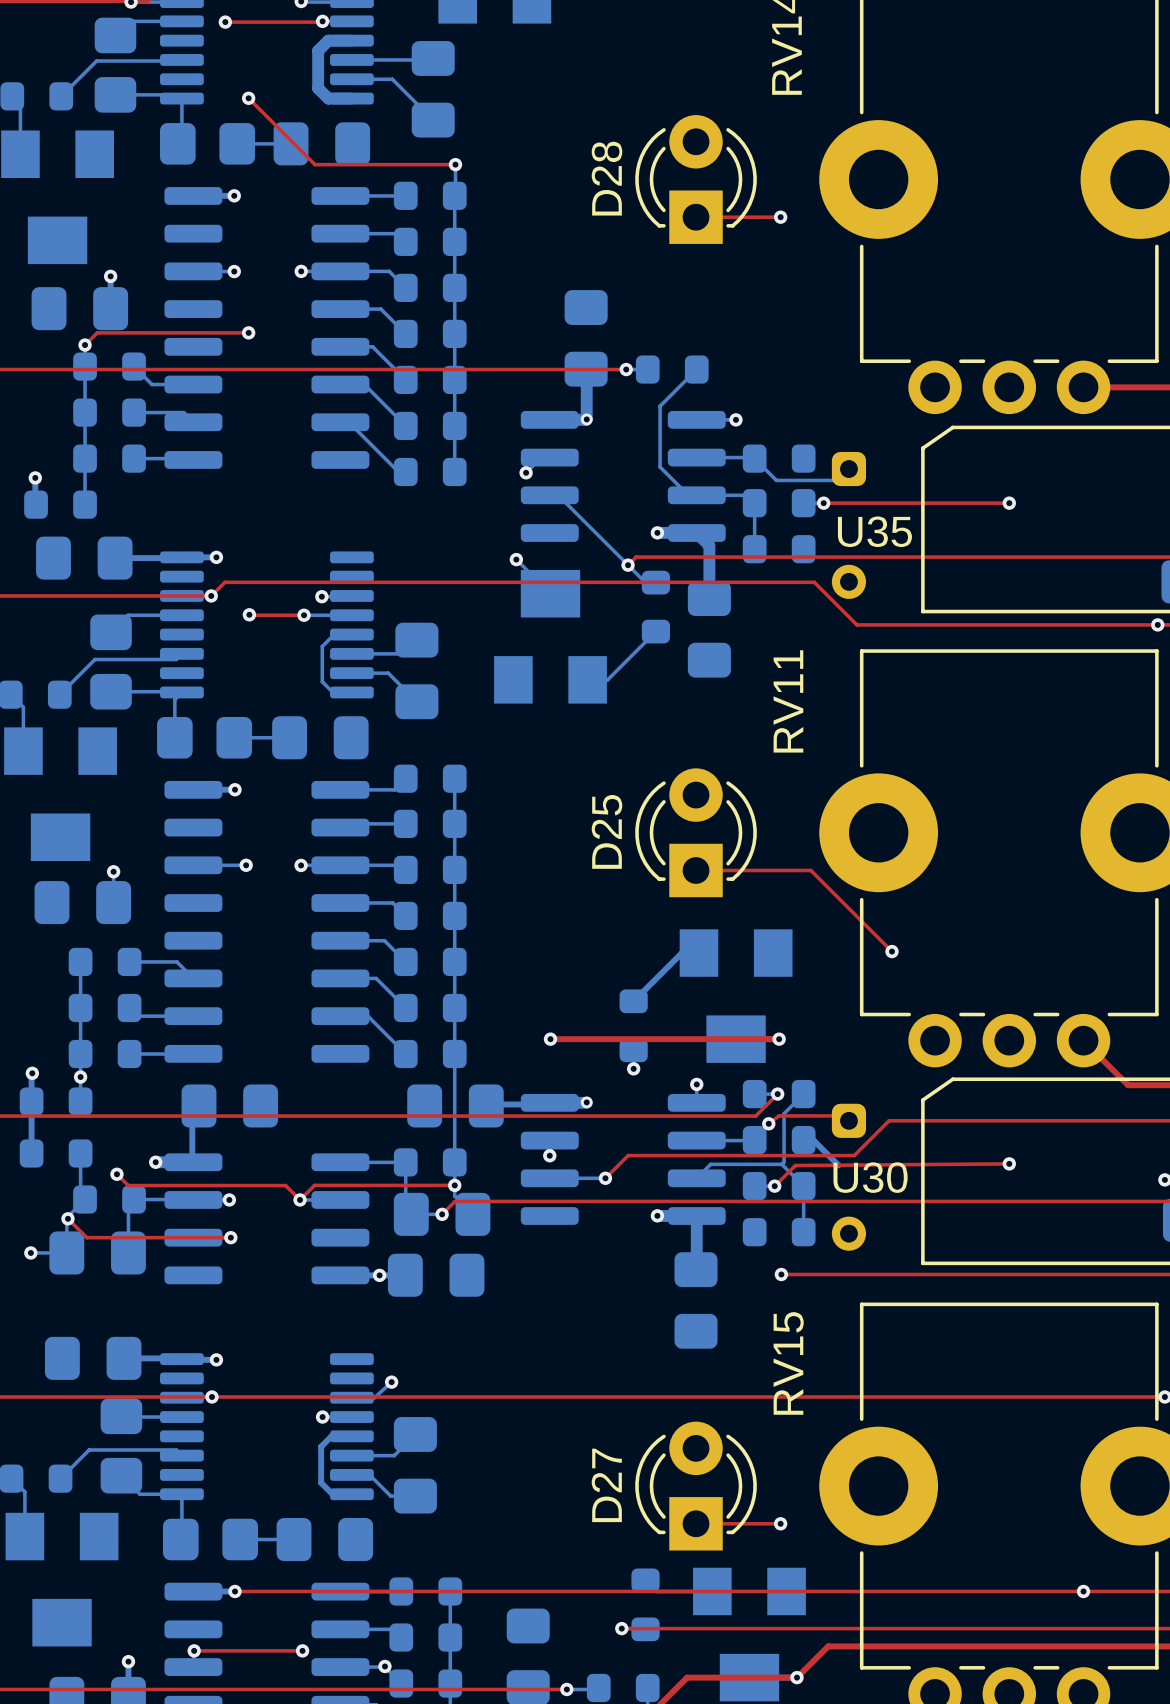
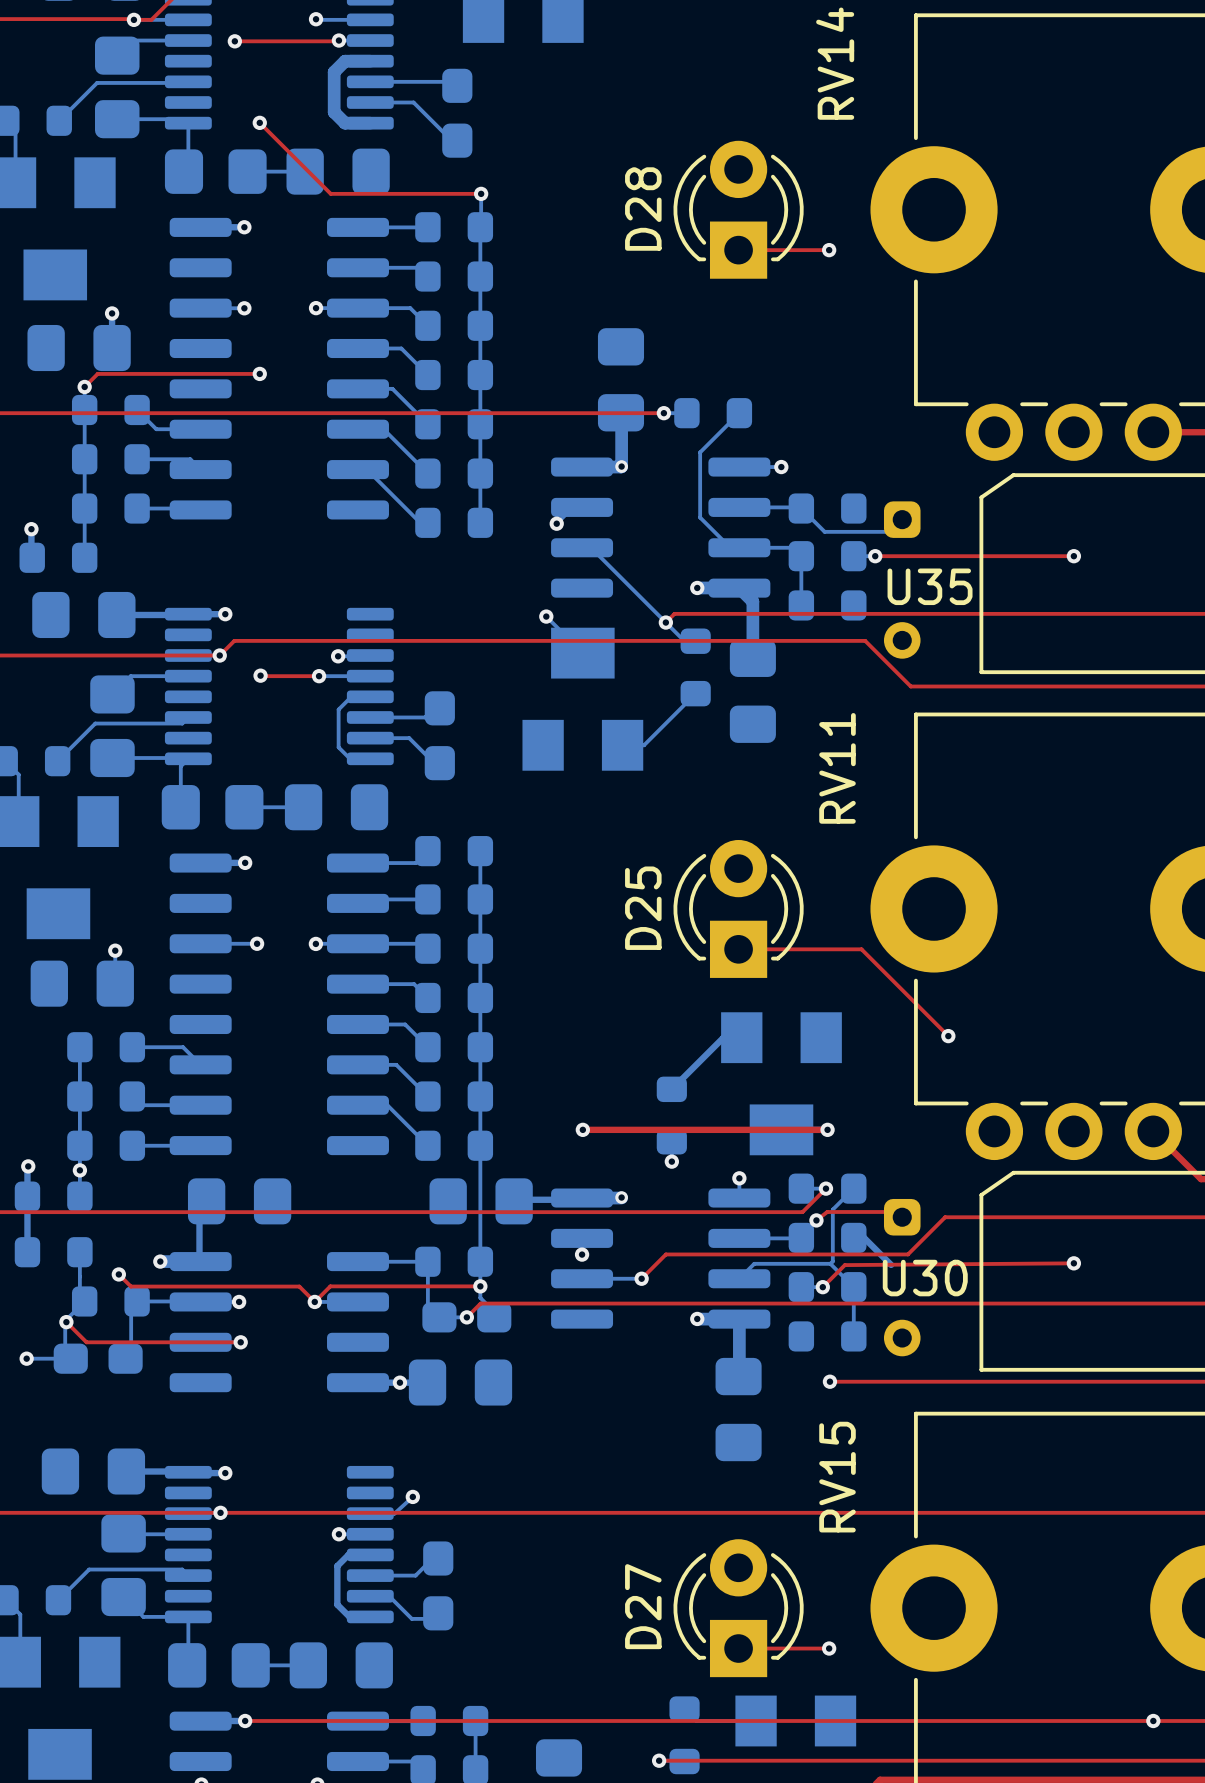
part footprint: [411, 41, 455, 138] -> [442, 68, 473, 158]
part footprint: [395, 622, 439, 720] -> [424, 691, 455, 781]
part footprint: [393, 1192, 491, 1236] -> [422, 1302, 512, 1333]
part footprint: [49, 1231, 146, 1275] -> [53, 1343, 143, 1374]
part footprint: [393, 1417, 437, 1514] -> [423, 1541, 454, 1631]

